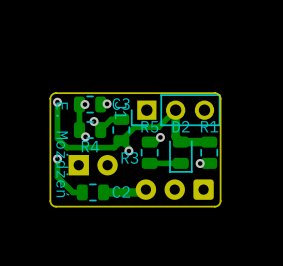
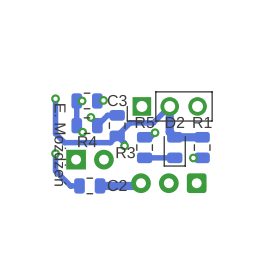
board edge: (214, 93) (52, 94) (50, 98) (51, 204) (56, 206) (218, 205) (220, 200) (220, 98) (218, 94) (214, 93) -> none
J1 name: J1 (120, 110) -> none

